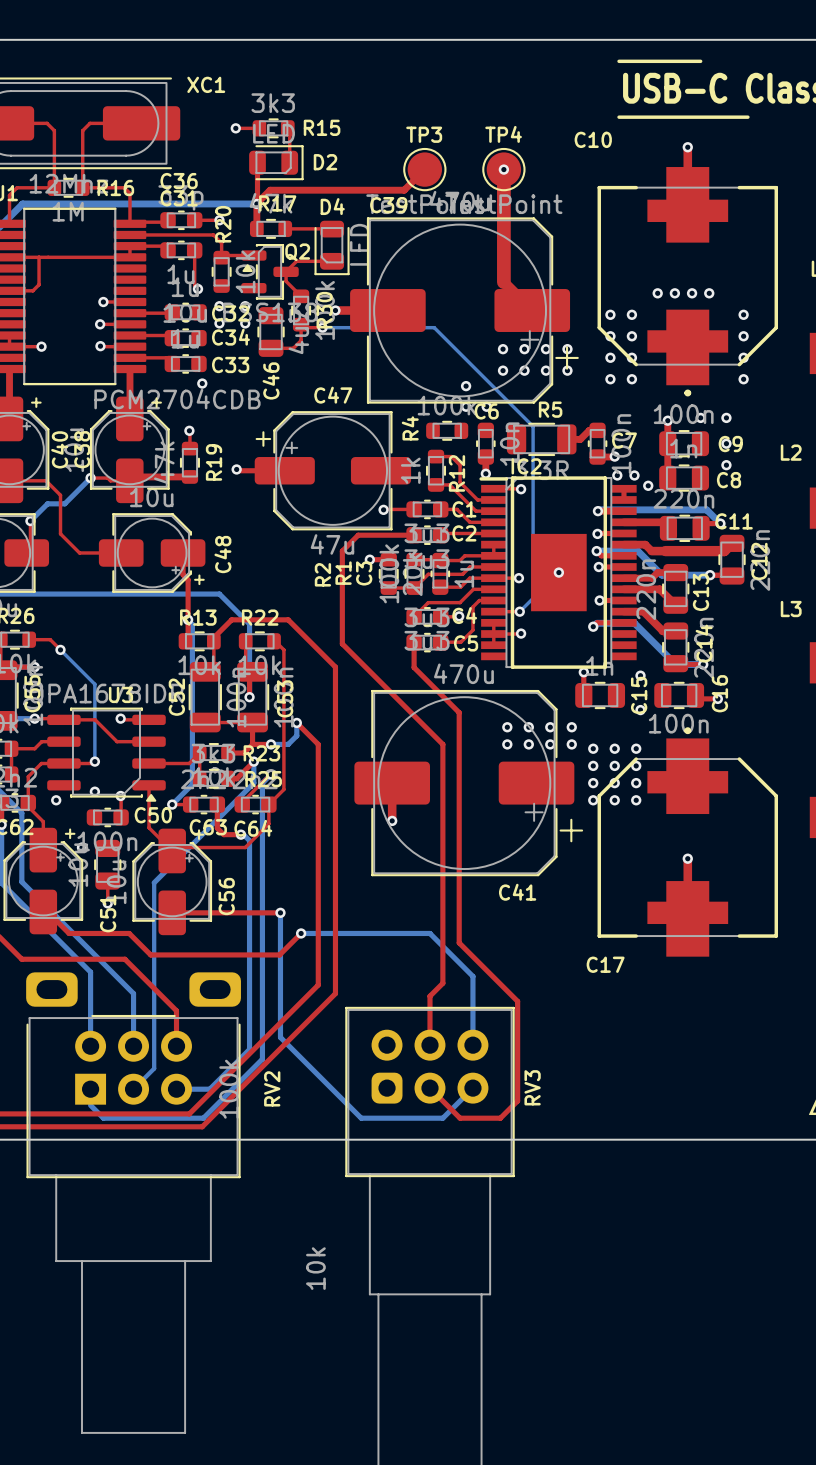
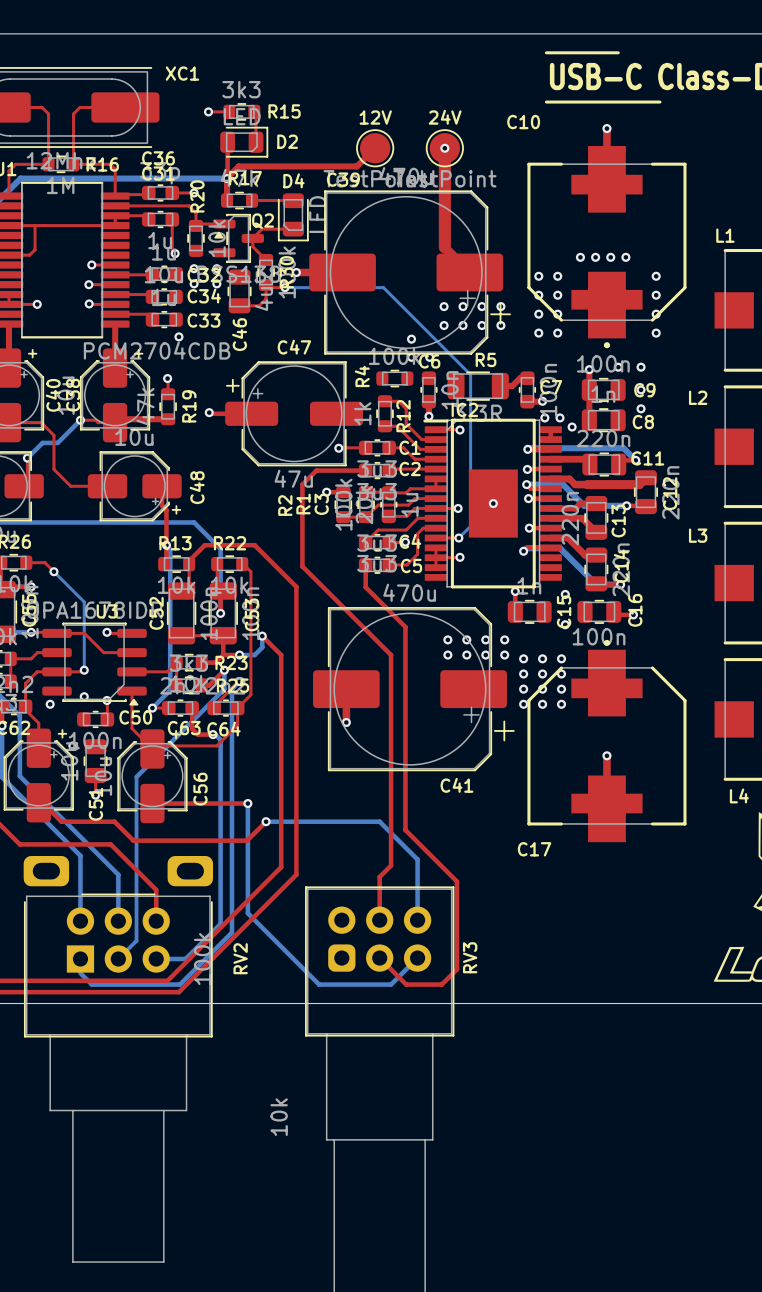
TP3 name: TP3 (424, 134) -> 12V (375, 117)
TP4 name: TP4 (503, 134) -> 24V (445, 117)

